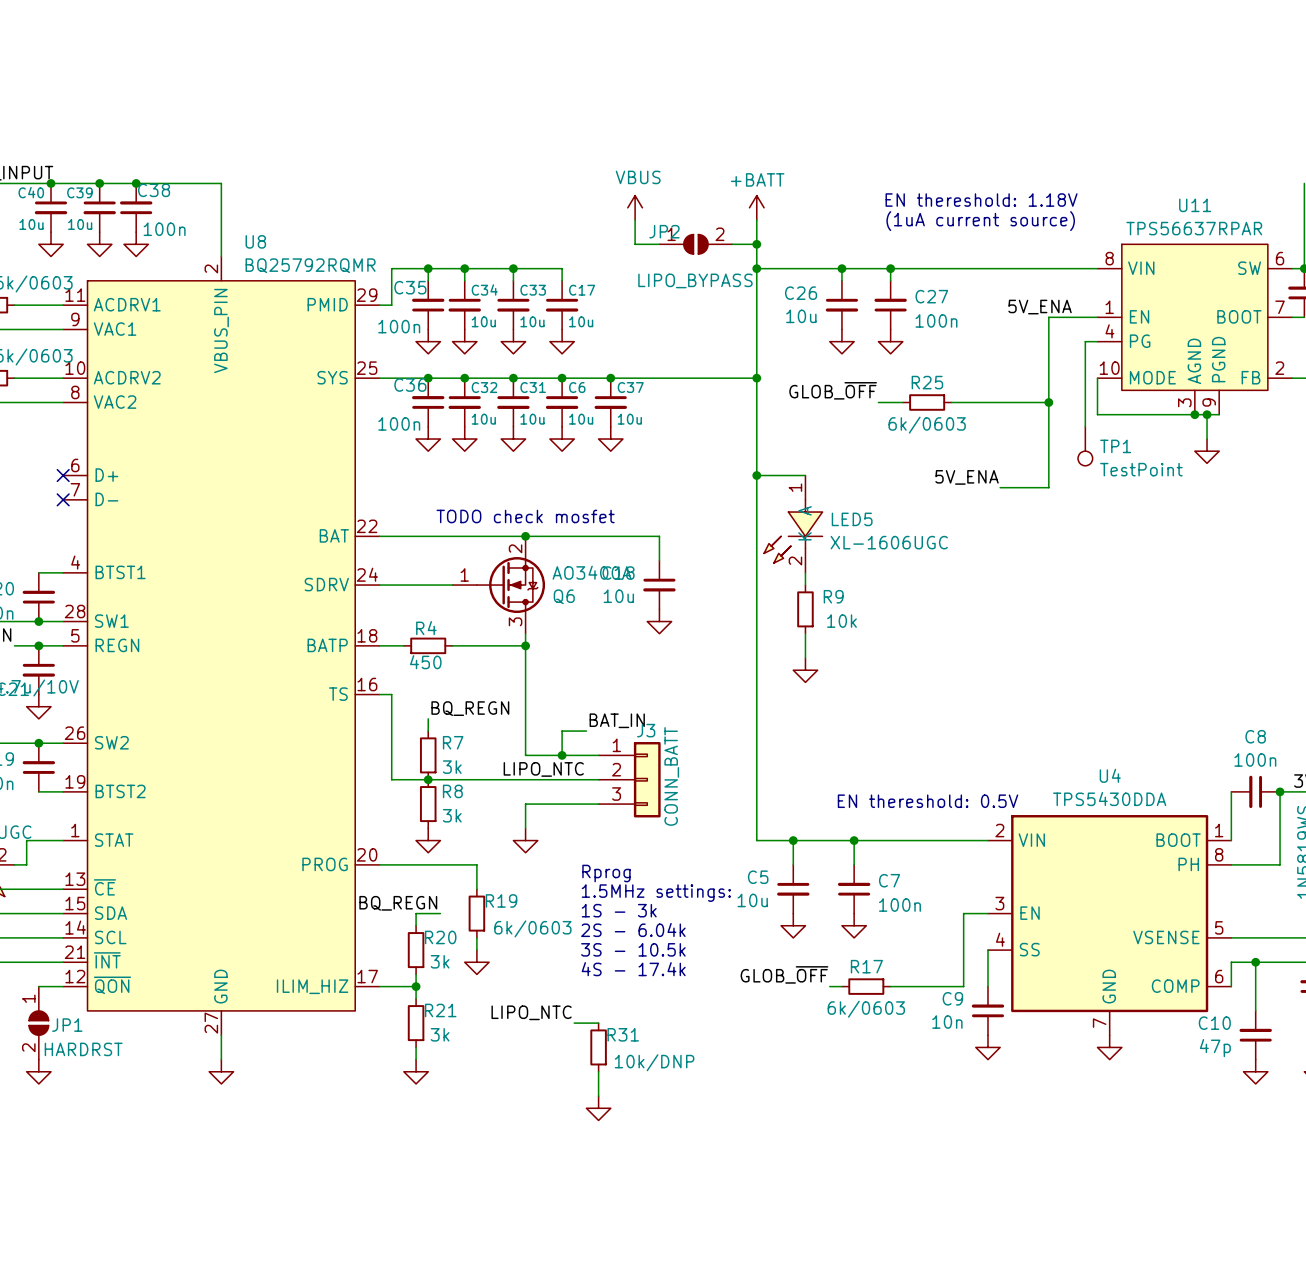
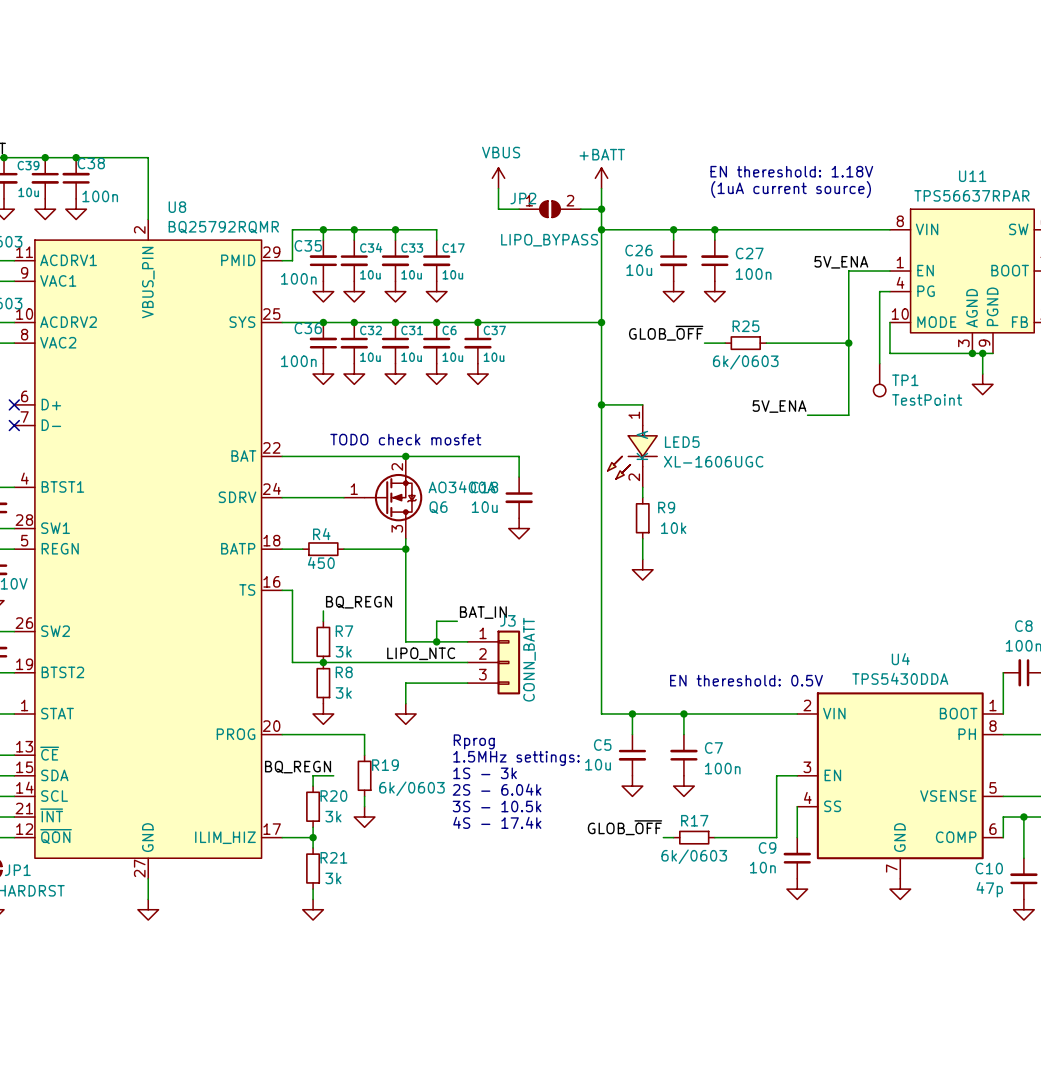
label: LIPO_NTC (531, 1012) -> none
wire: (574, 1023) (598, 1023) -> none
R31: 10k/DNP (598, 1047) -> none
wire: (598, 1071) (598, 1096) -> none
power symbol: (598, 1108) -> none

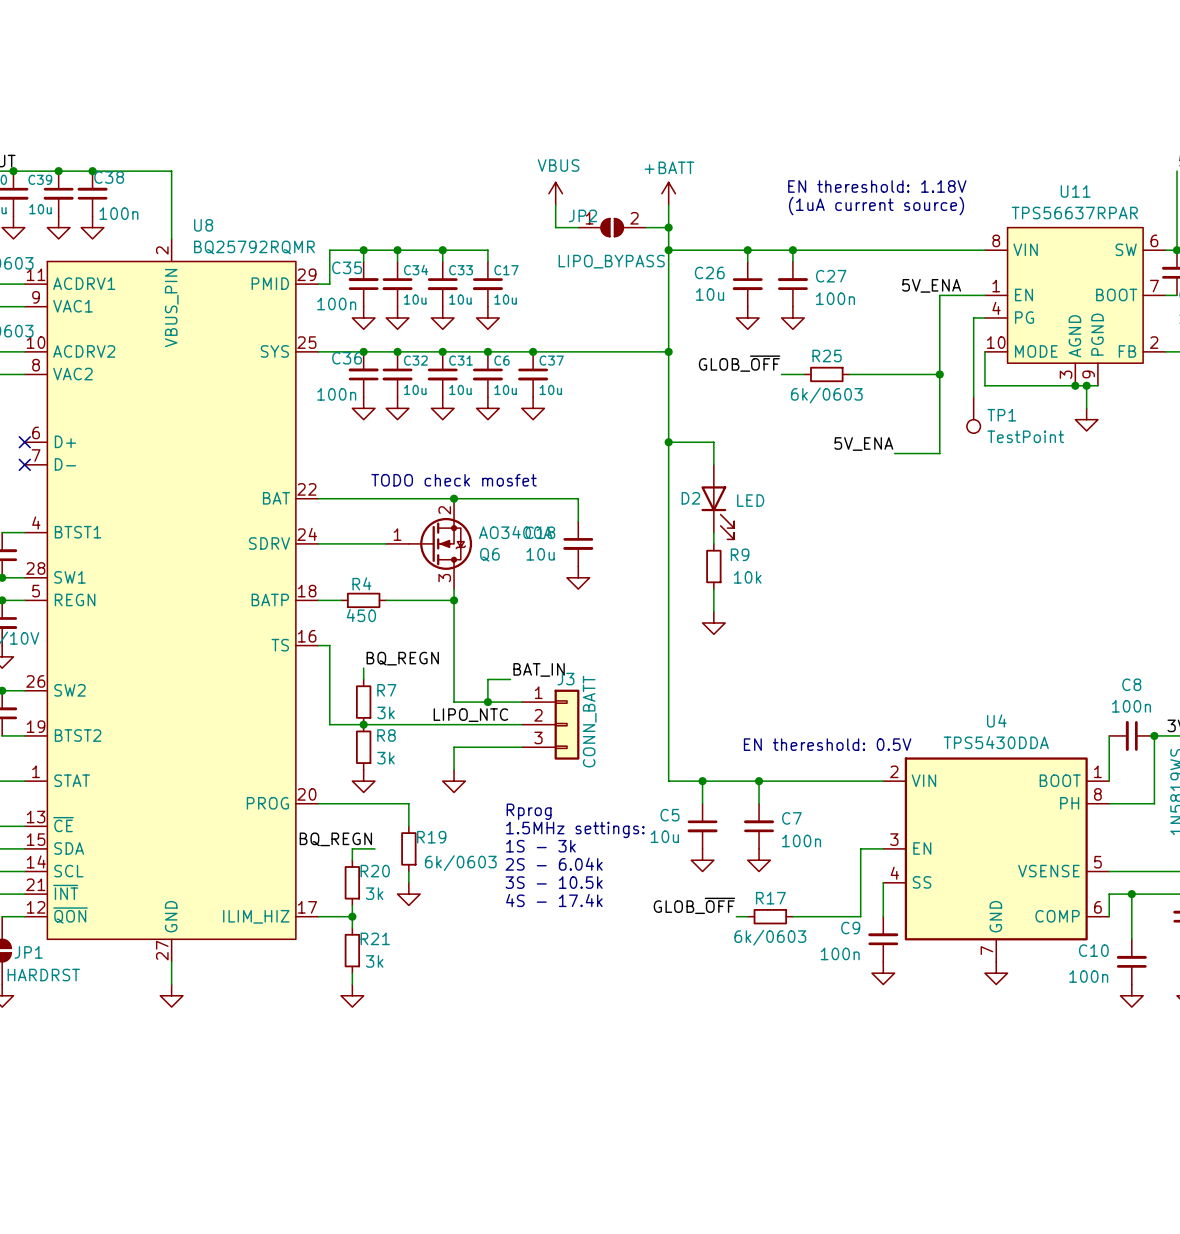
LED5: XL-1606UGC (632, 446) -> none
D2: none -> LED (717, 502)
C9 value: 10n (762, 867) -> 100n (840, 953)
C10 value: 47p (989, 889) -> 100n (1088, 976)

